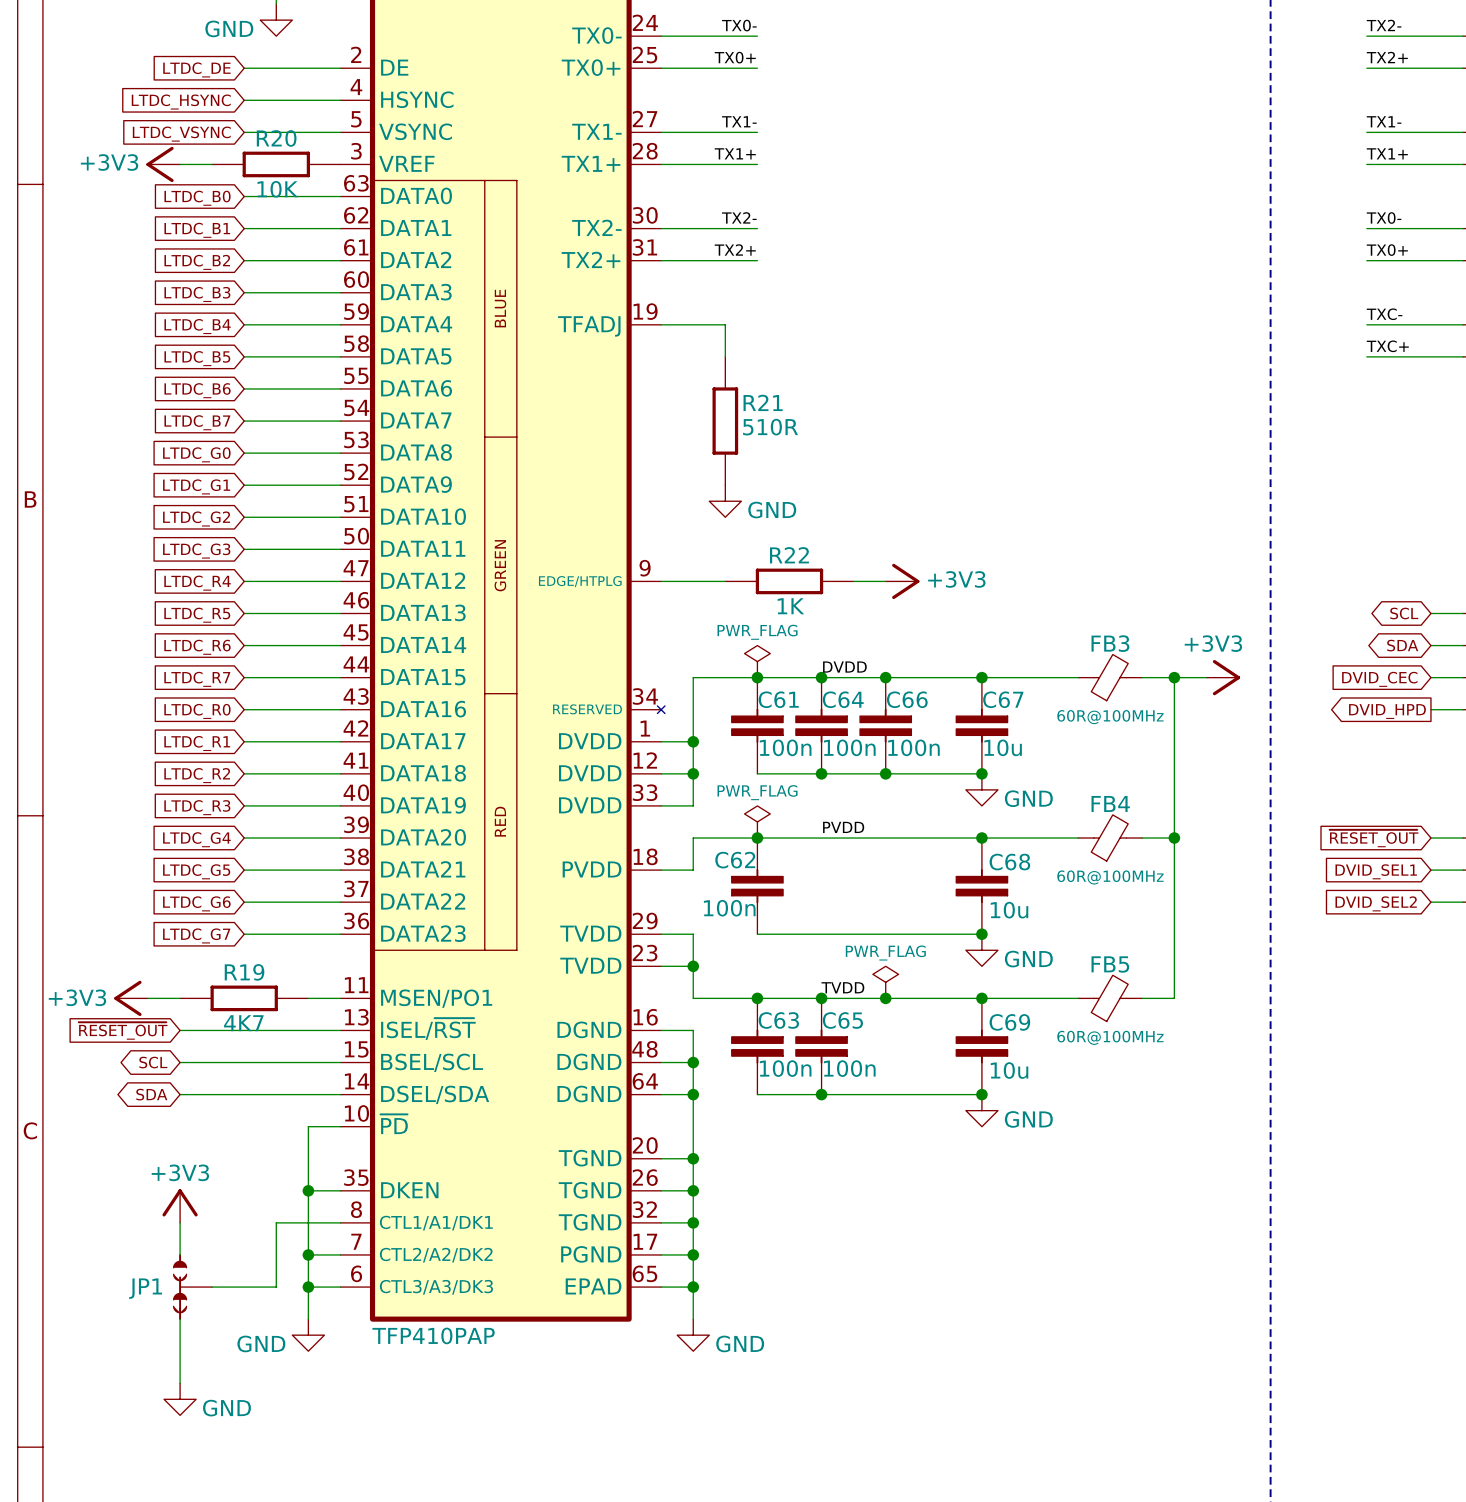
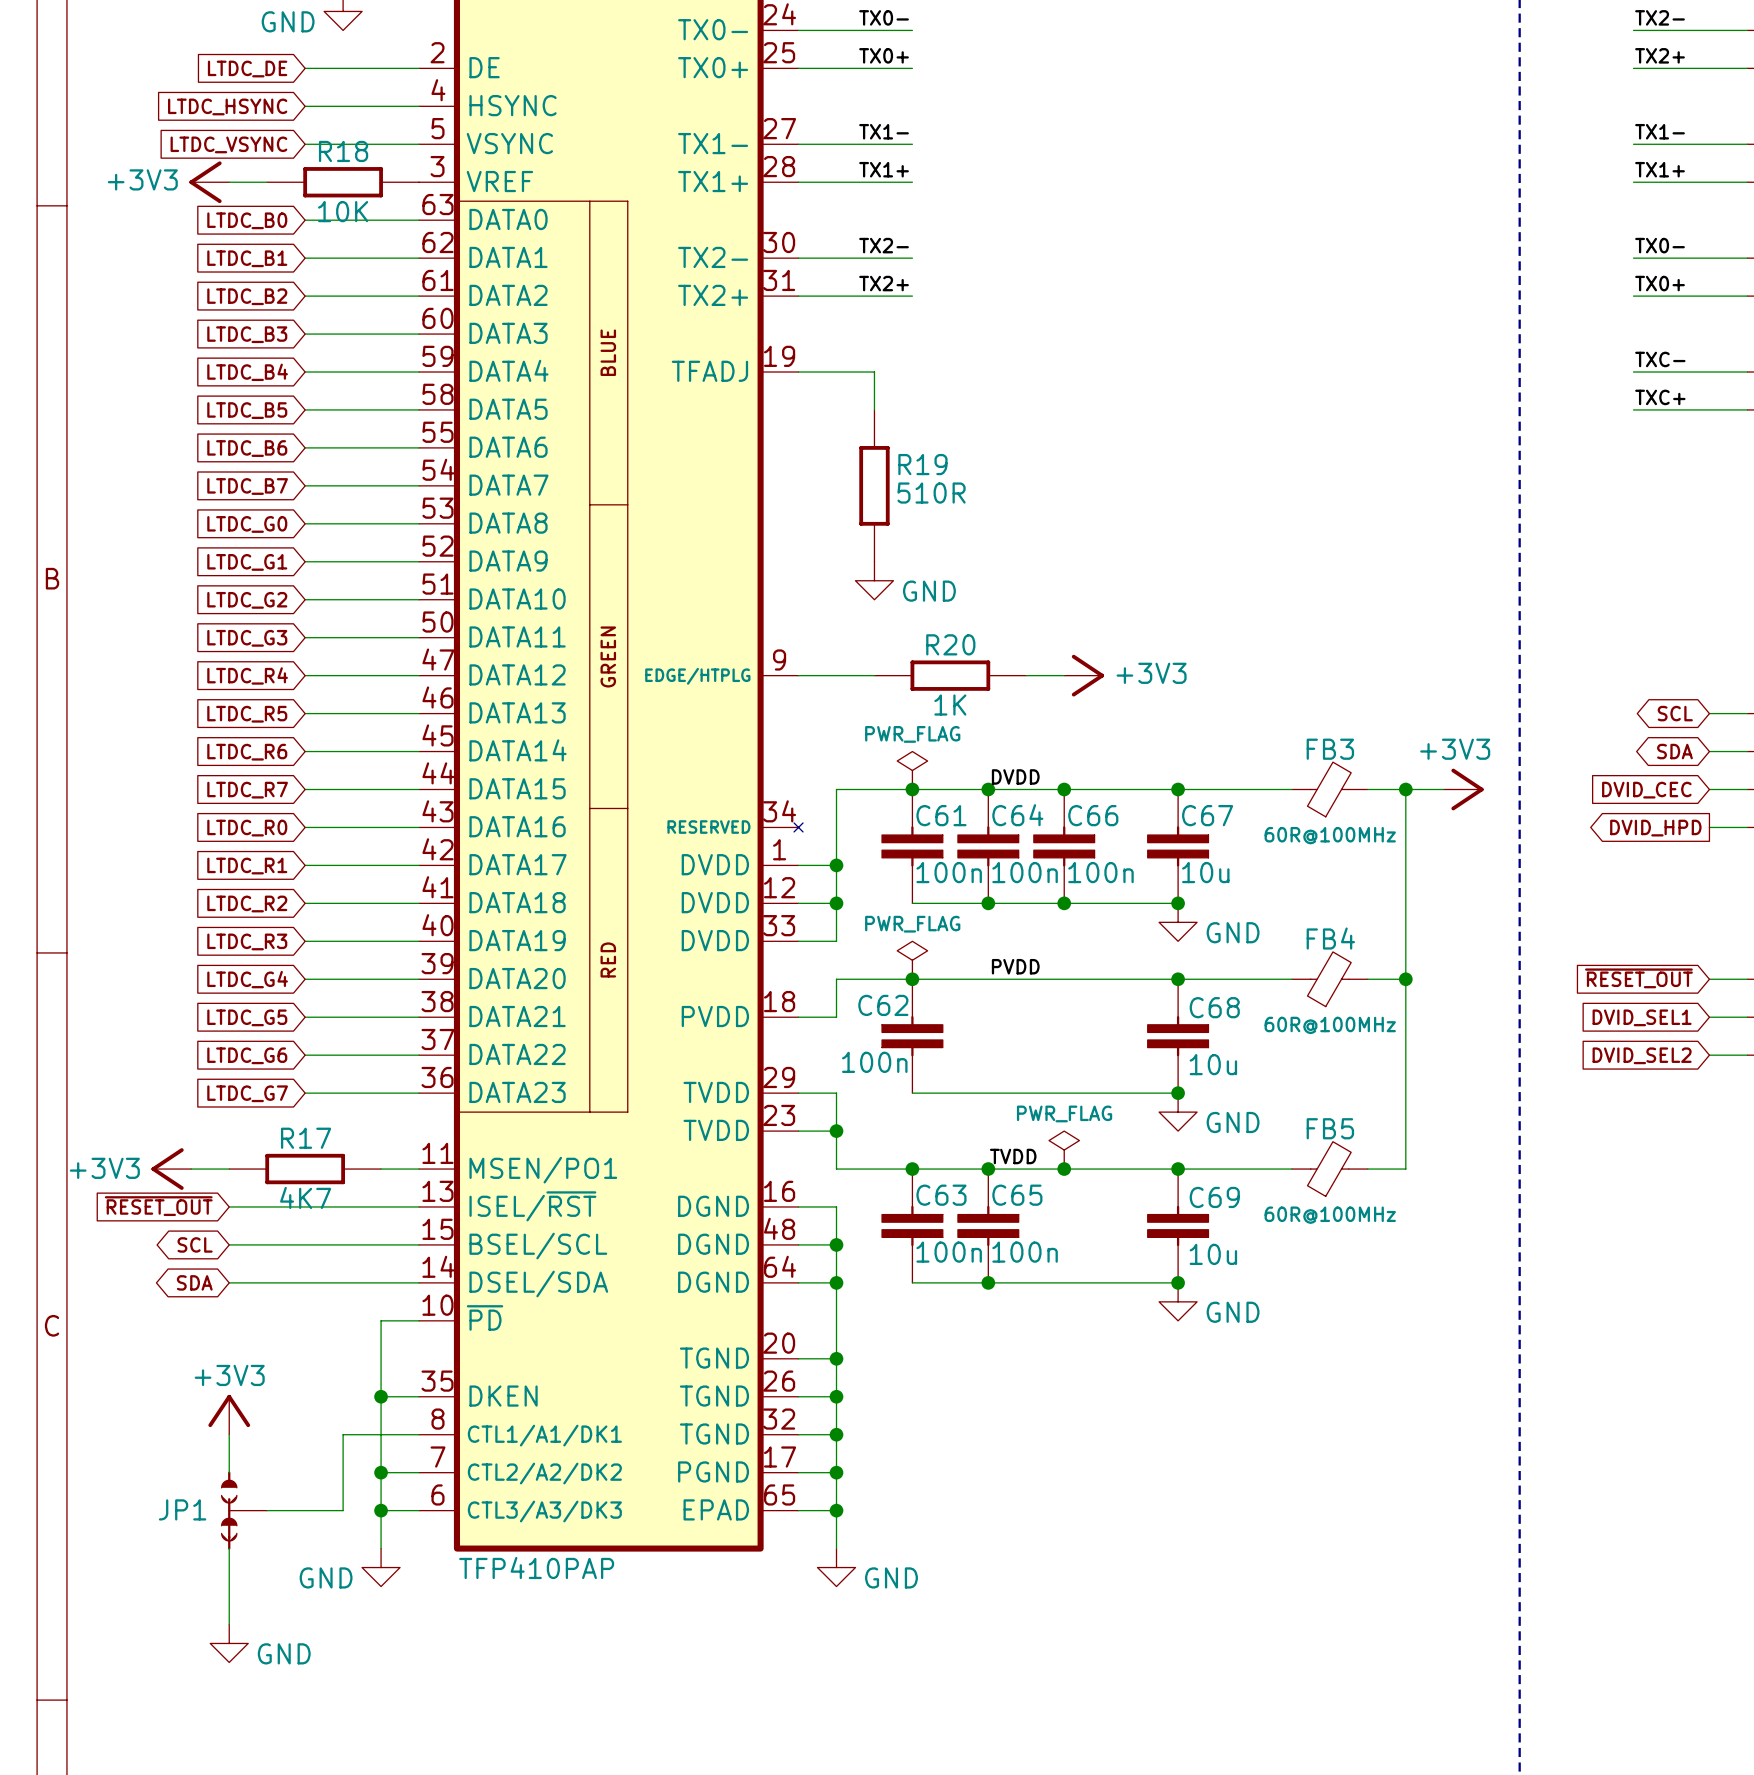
R20 name: R20 (276, 138) -> R18 (343, 151)
R21 name: R21 (763, 402) -> R19 (922, 464)
R22 name: R22 (789, 555) -> R20 (950, 644)
R19 name: R19 (244, 972) -> R17 (306, 1138)

